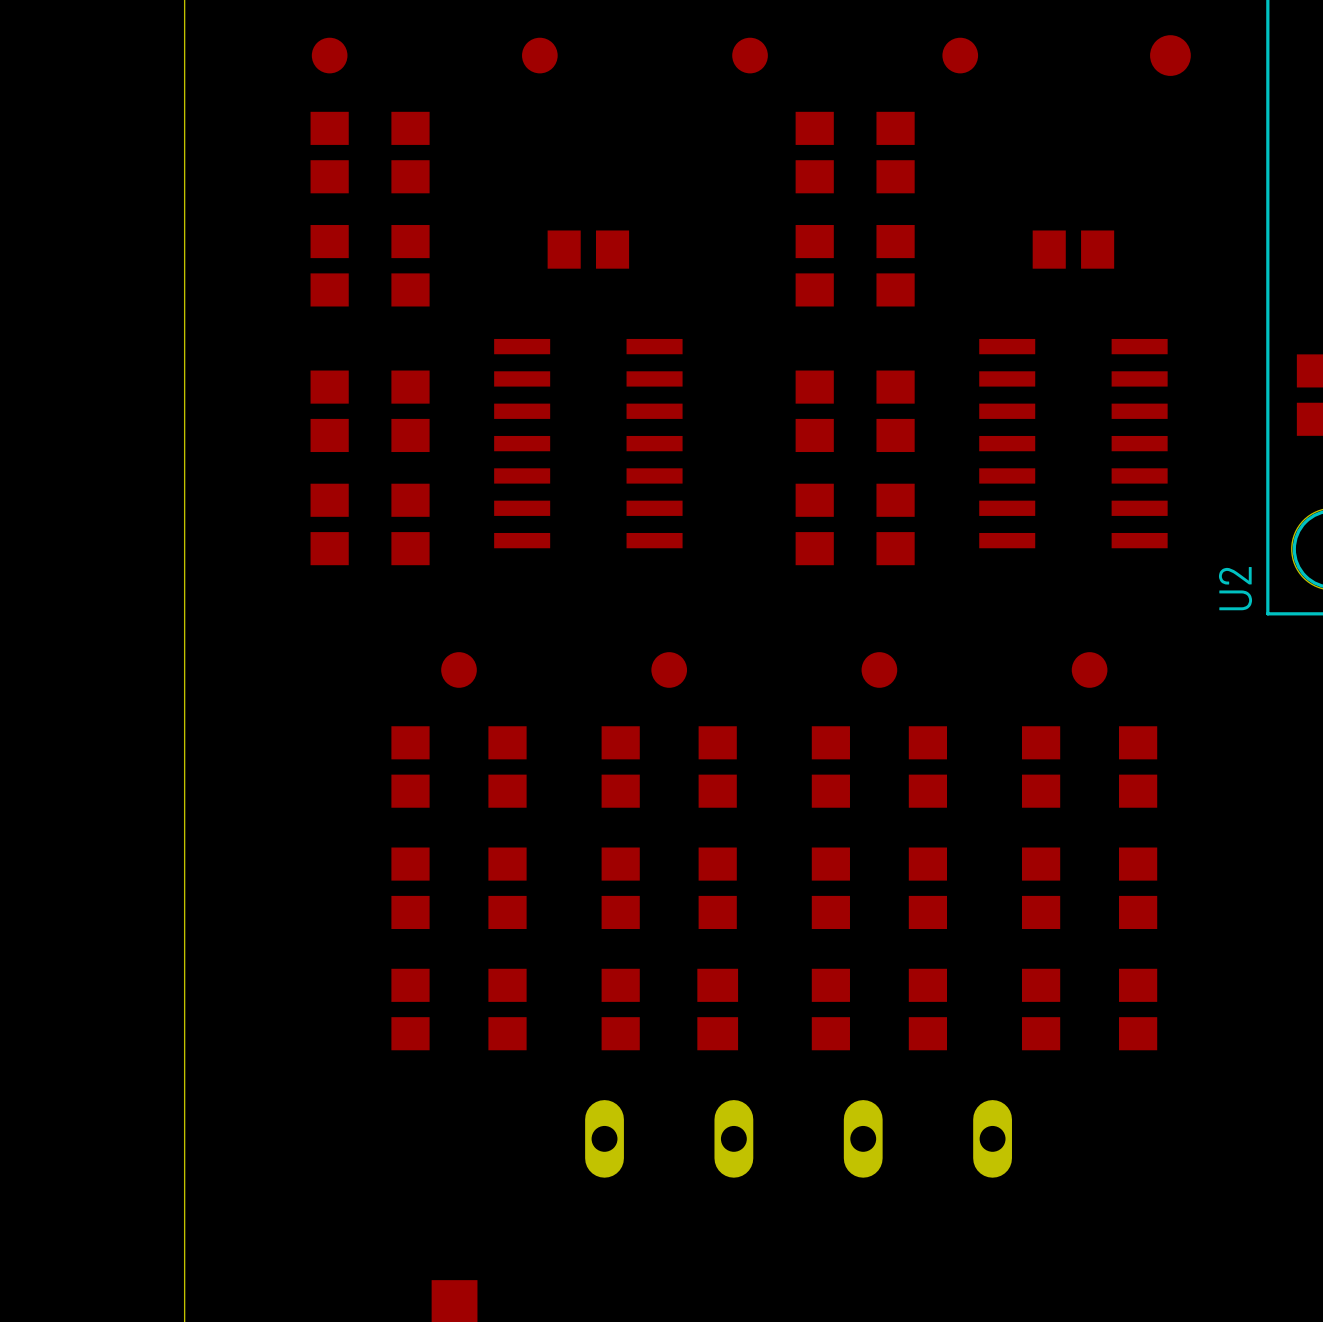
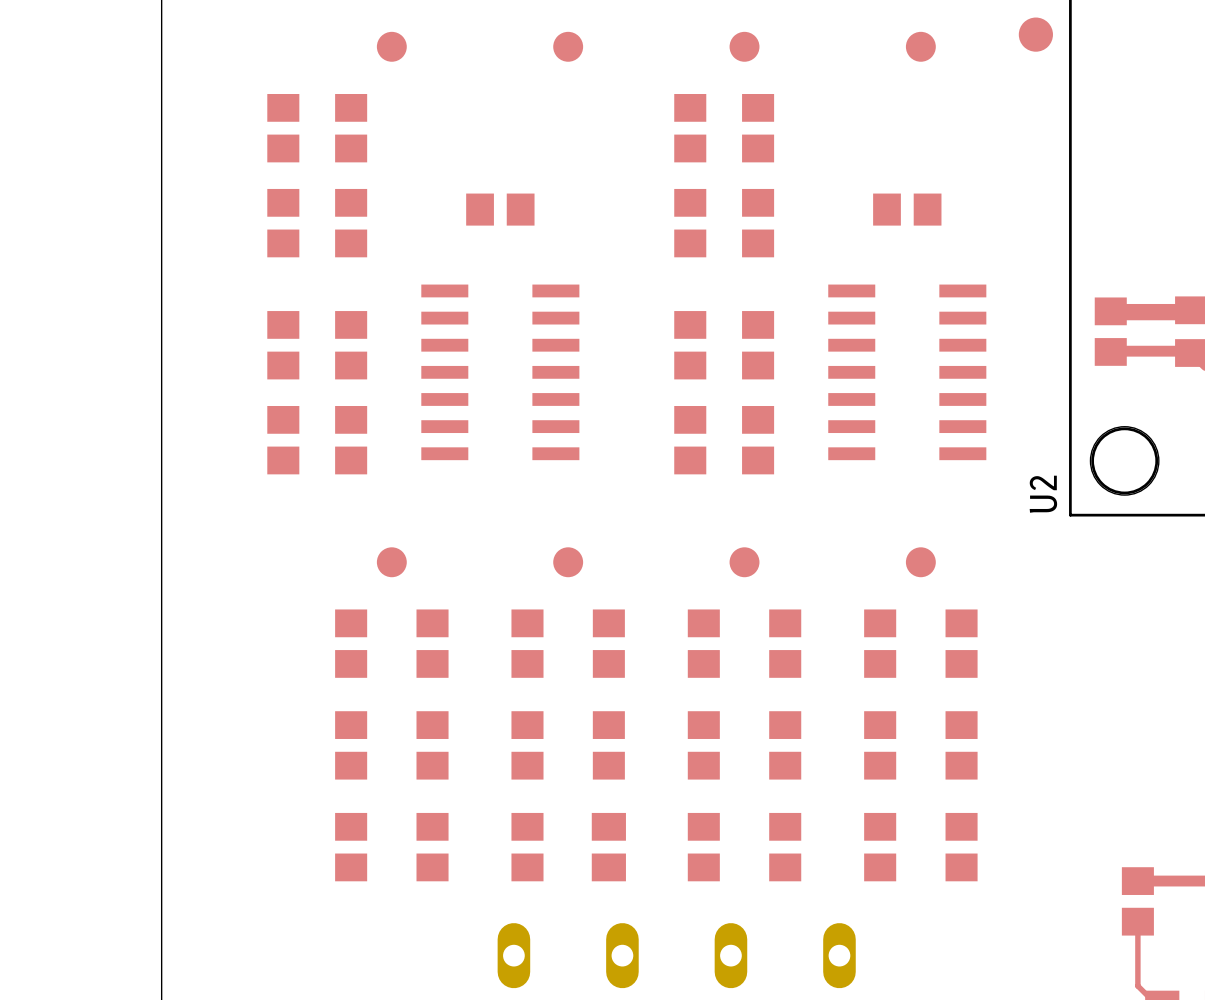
part: (329, 55) -> none
part: none -> (391, 46)
part: (539, 55) -> none
part: none -> (568, 46)
part: (750, 55) -> none
part: none -> (744, 46)
part: (960, 55) -> none
part: none -> (920, 46)
part position: (1170, 55) -> (1035, 34)

